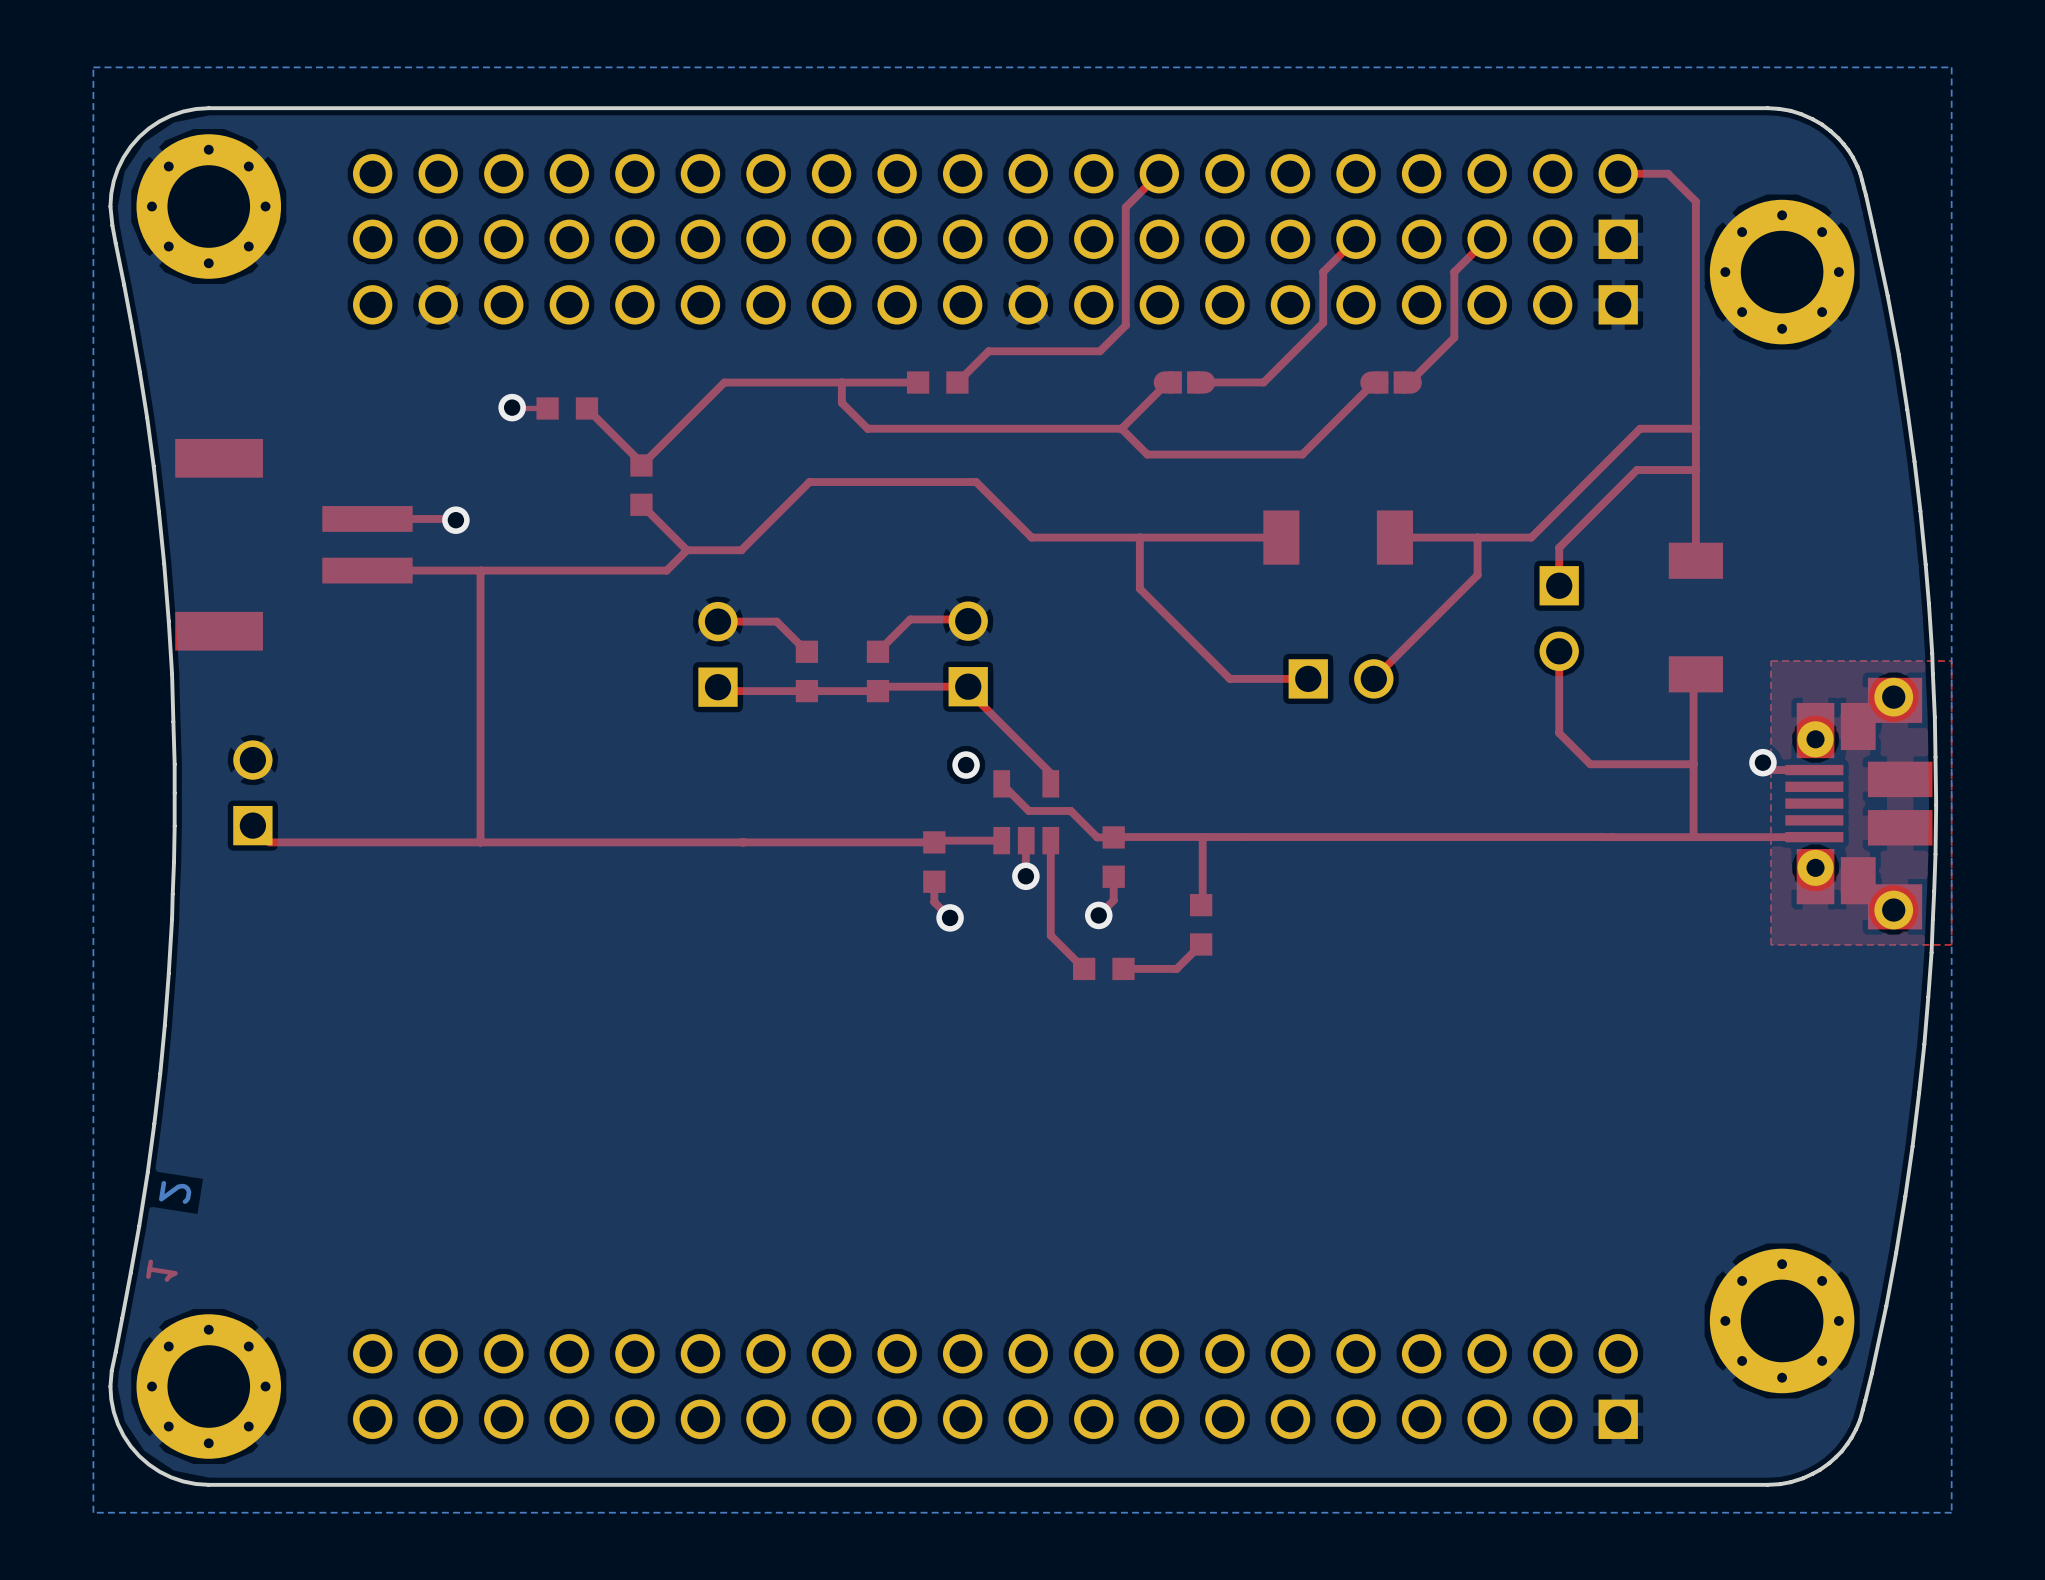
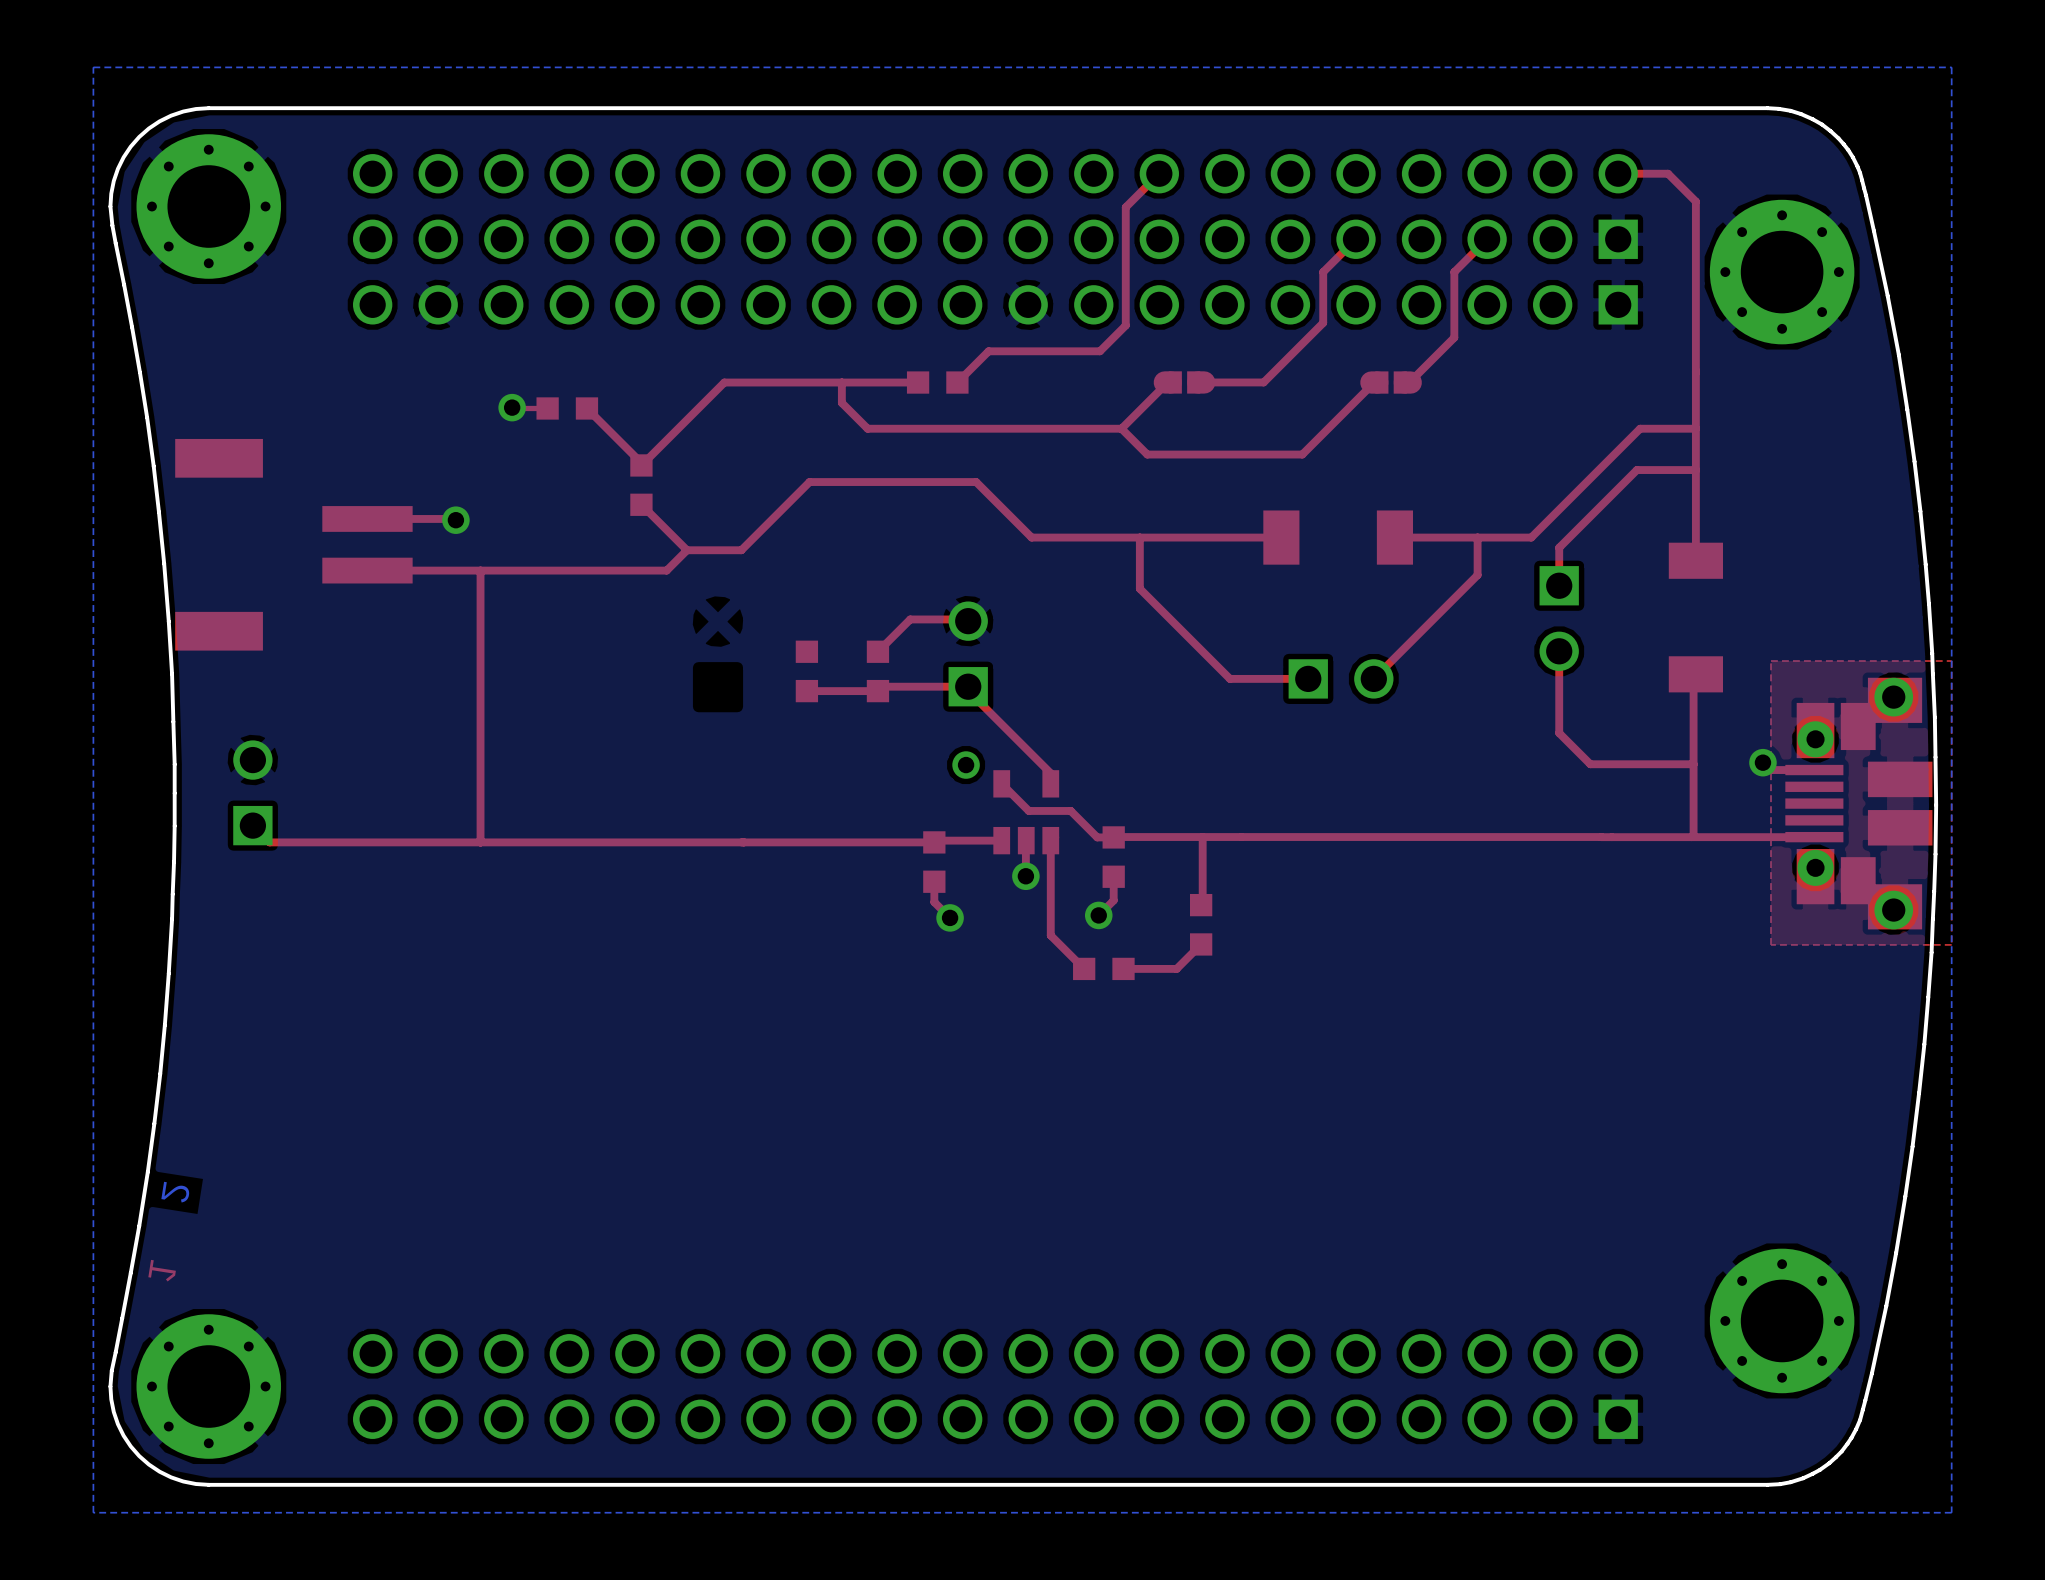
top track: (718, 621) (776, 621) (806, 651) -> none
part: (718, 654) -> none
top track: (718, 687) (721, 691) (806, 691) -> none

